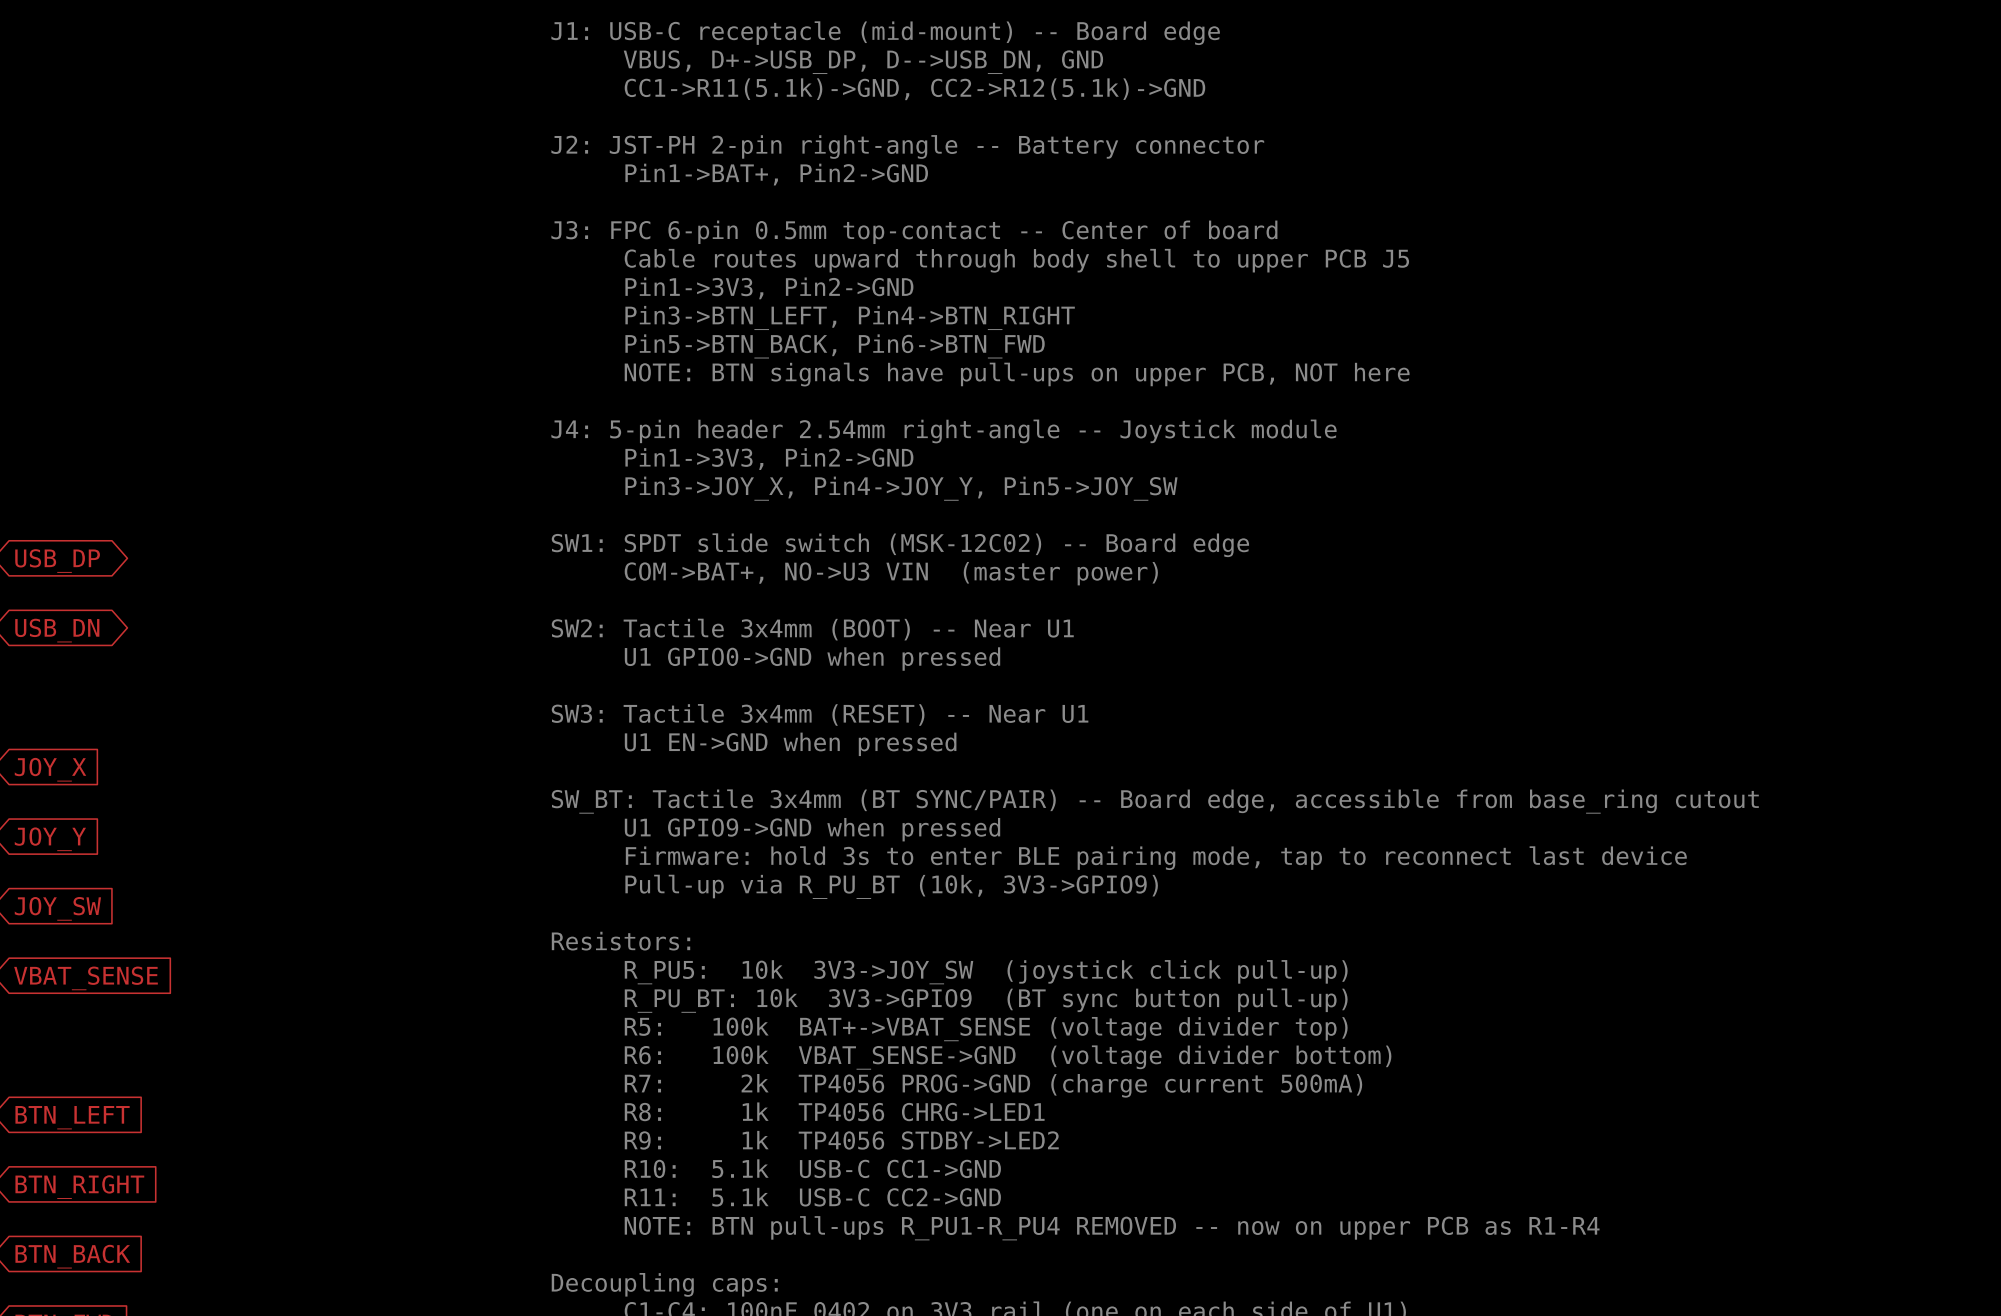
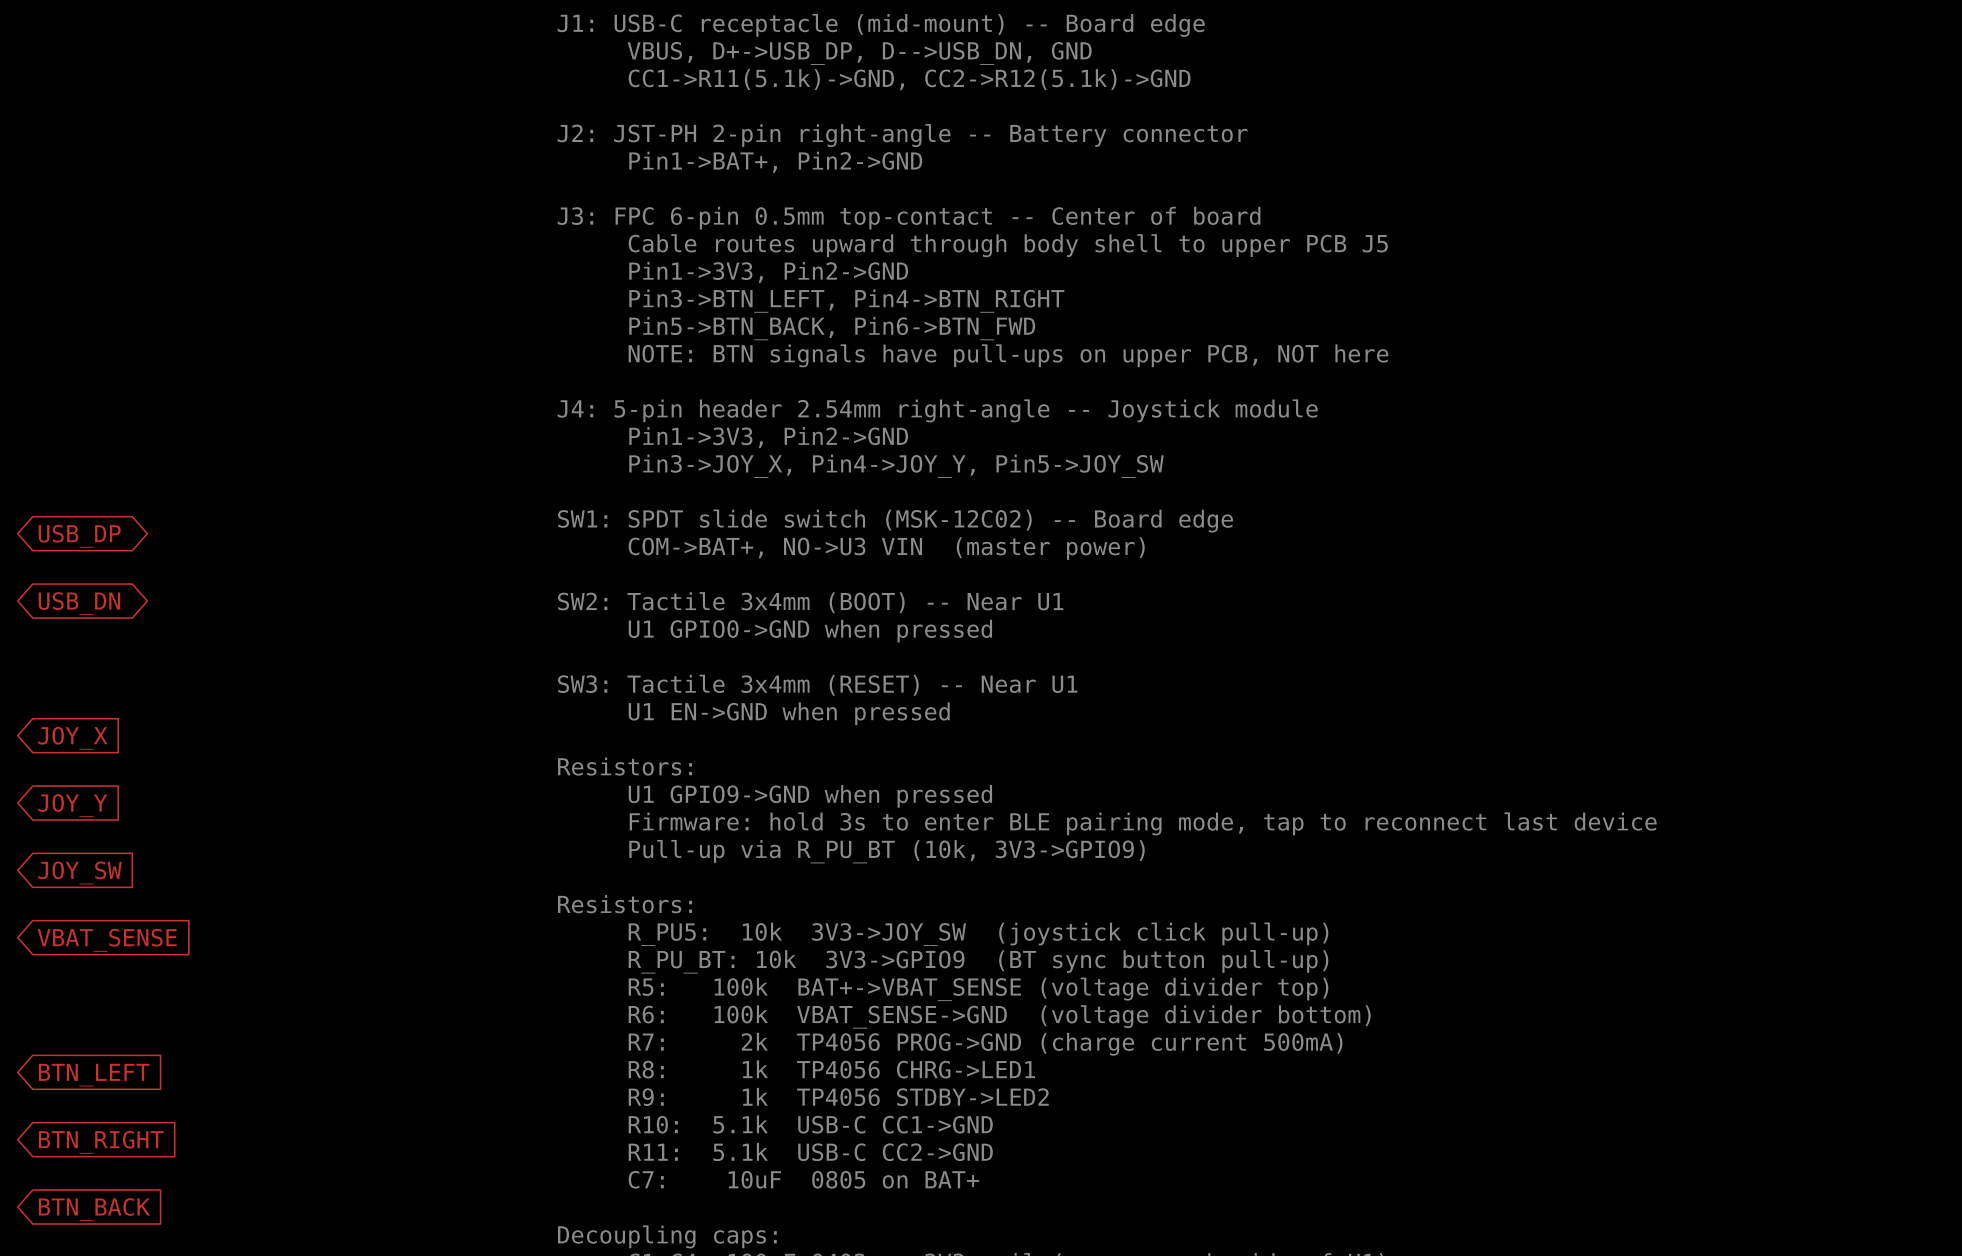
text: SW_BT: Tactile 3x4mm (BT SYNC/PAIR) -- Board edge, accessible from base_ring cutout (1155, 801) -> Resistors: (625, 766)
text: NOTE: BTN pull-ups R_PU1-R_PU4 REMOVED -- now on upper PCB as R1-R4 (1112, 1228) -> C7: 10uF 0805 on BAT+ (803, 1179)

